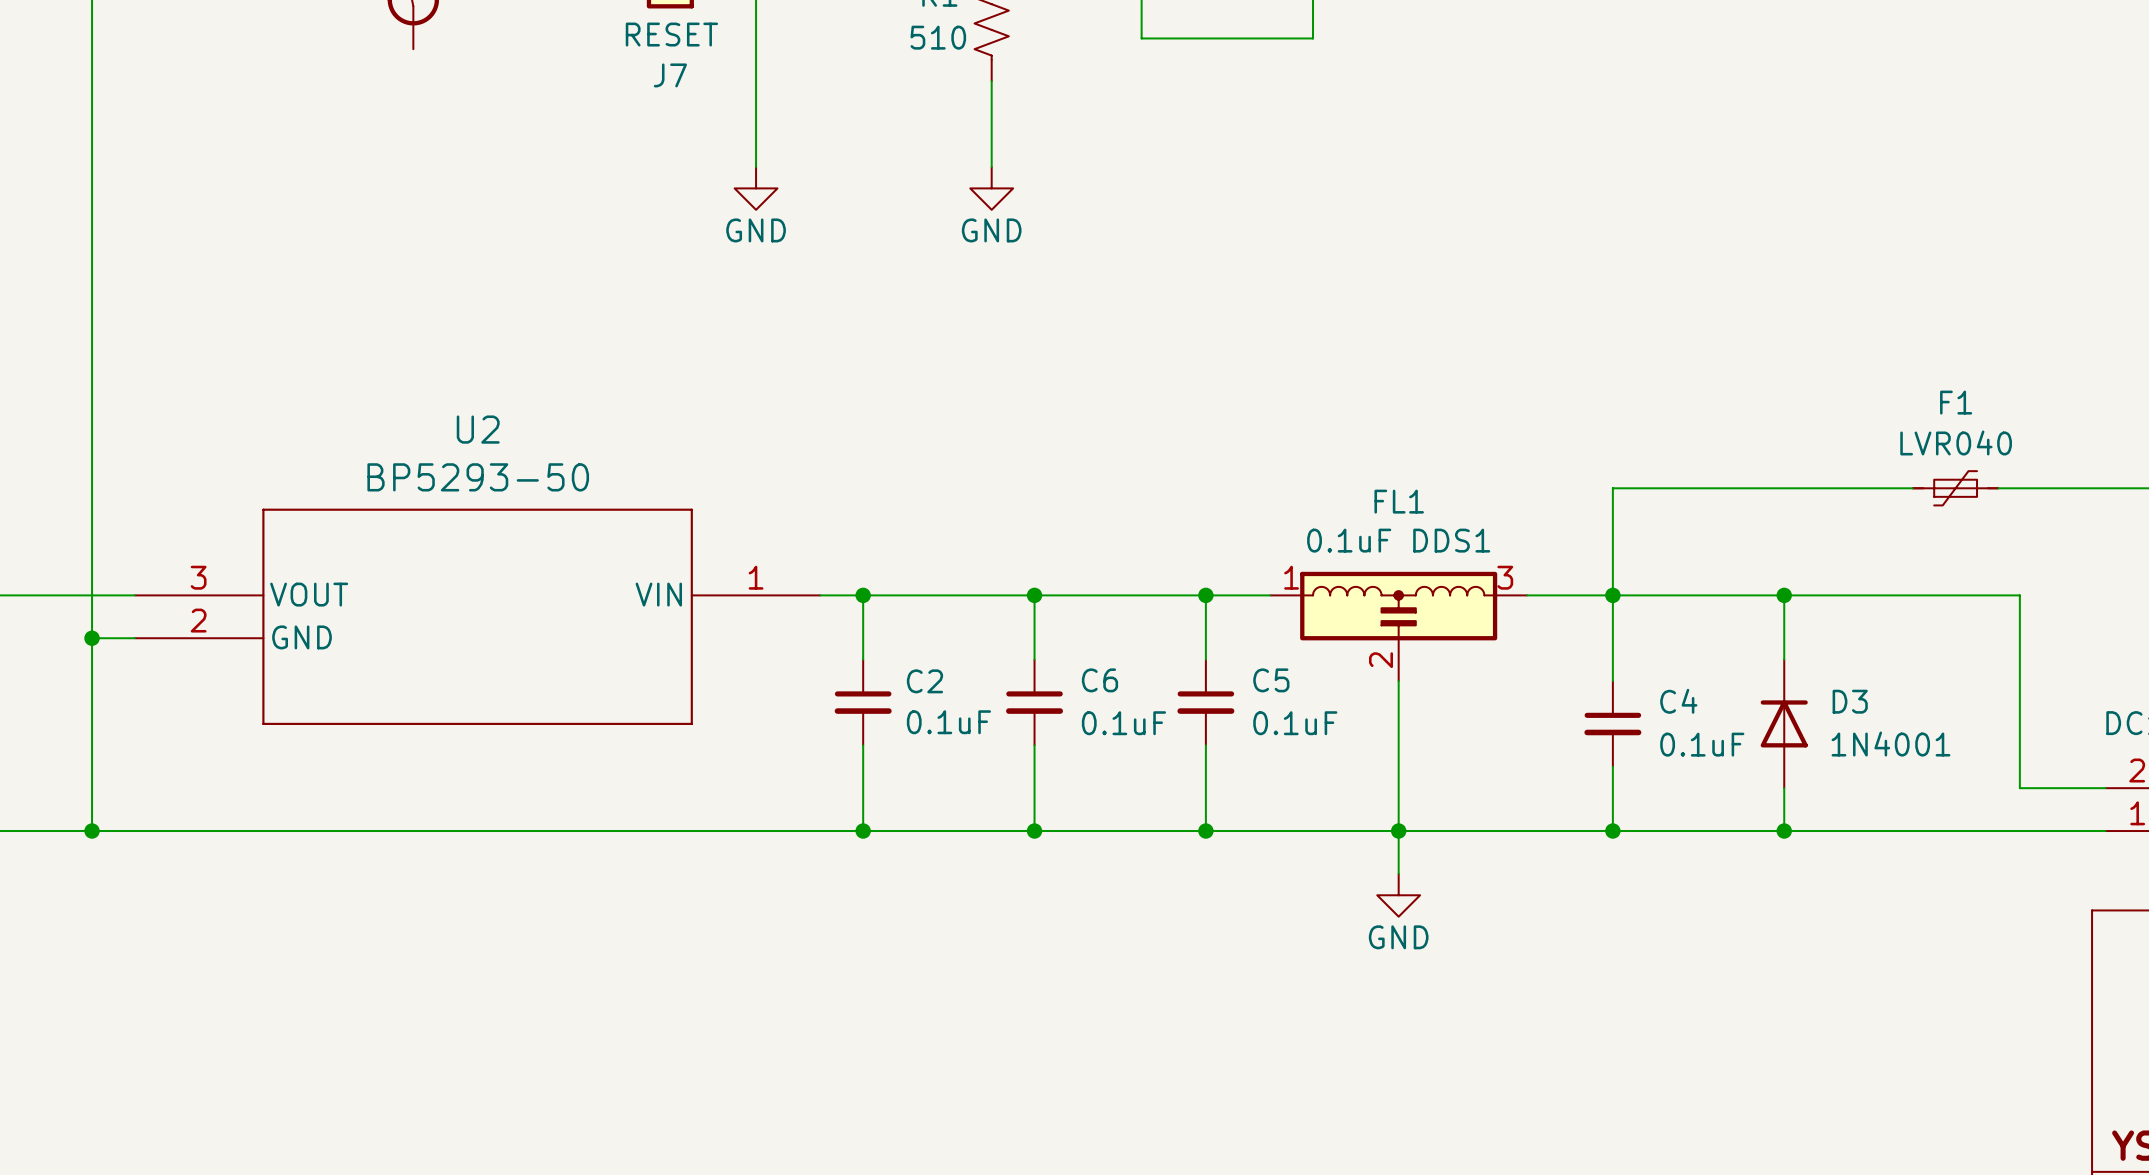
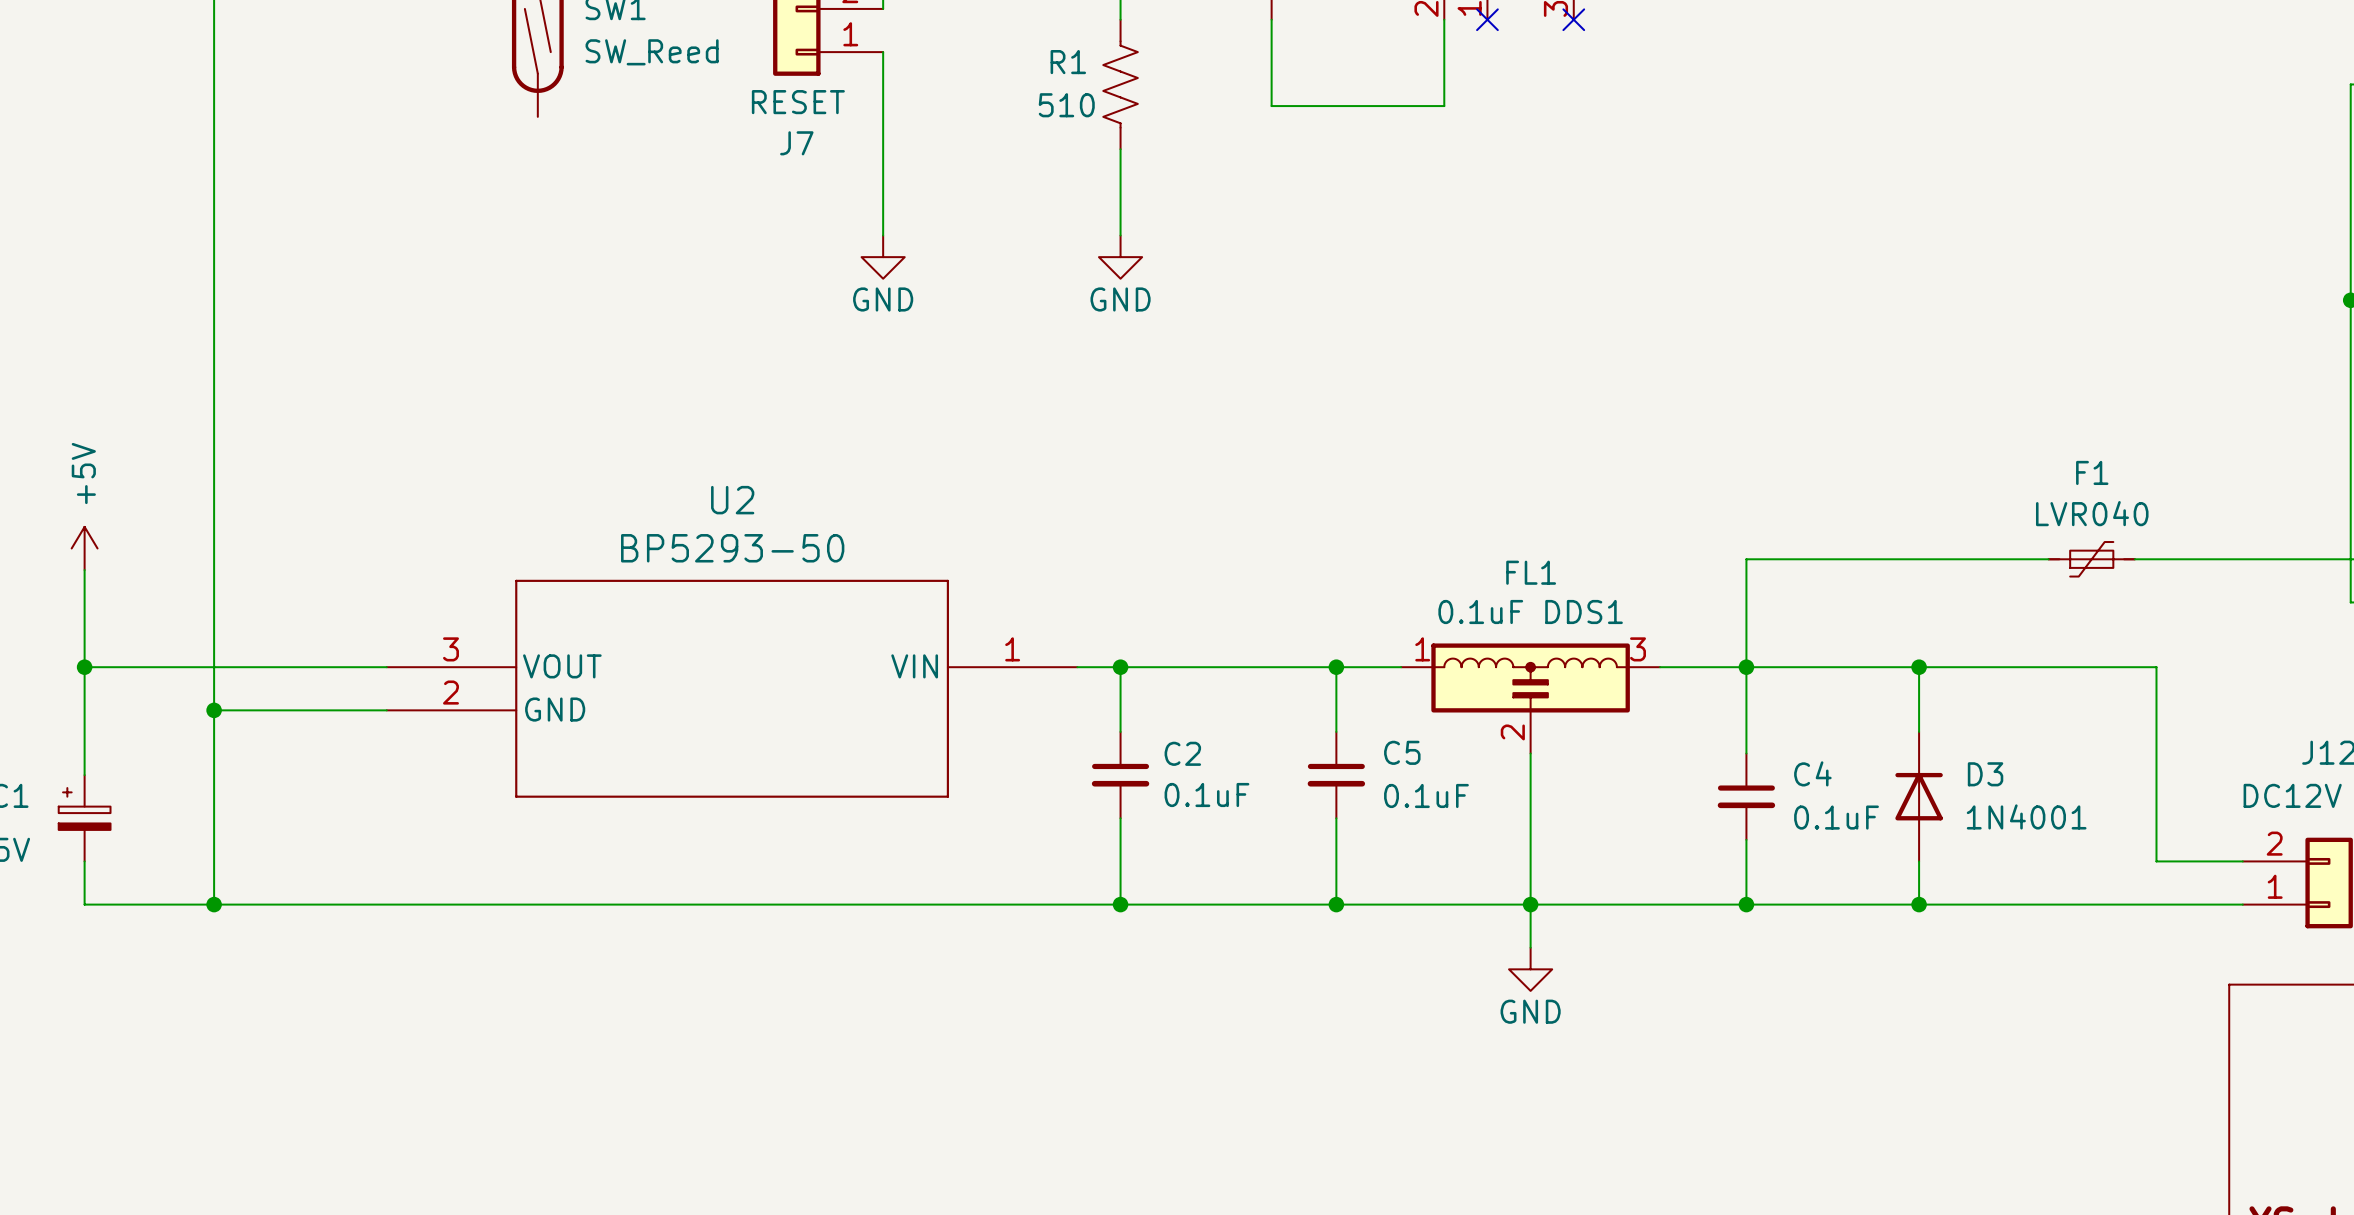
wire: (863, 595) (863, 659) -> none
junction: (863, 595) -> none
wire: (1034, 595) (1034, 659) -> (1120, 667) (1120, 731)
junction position: (1034, 595) -> (1120, 667)
U2 position: (477, 616) -> (732, 688)
C2 position: (863, 702) -> (1120, 775)
C6: 0.1uF (1034, 702) -> none
wire: (863, 745) (863, 831) -> none
wire: (1034, 745) (1034, 831) -> (1120, 818) (1120, 904)
junction: (863, 831) -> none
junction position: (1034, 831) -> (1120, 904)

